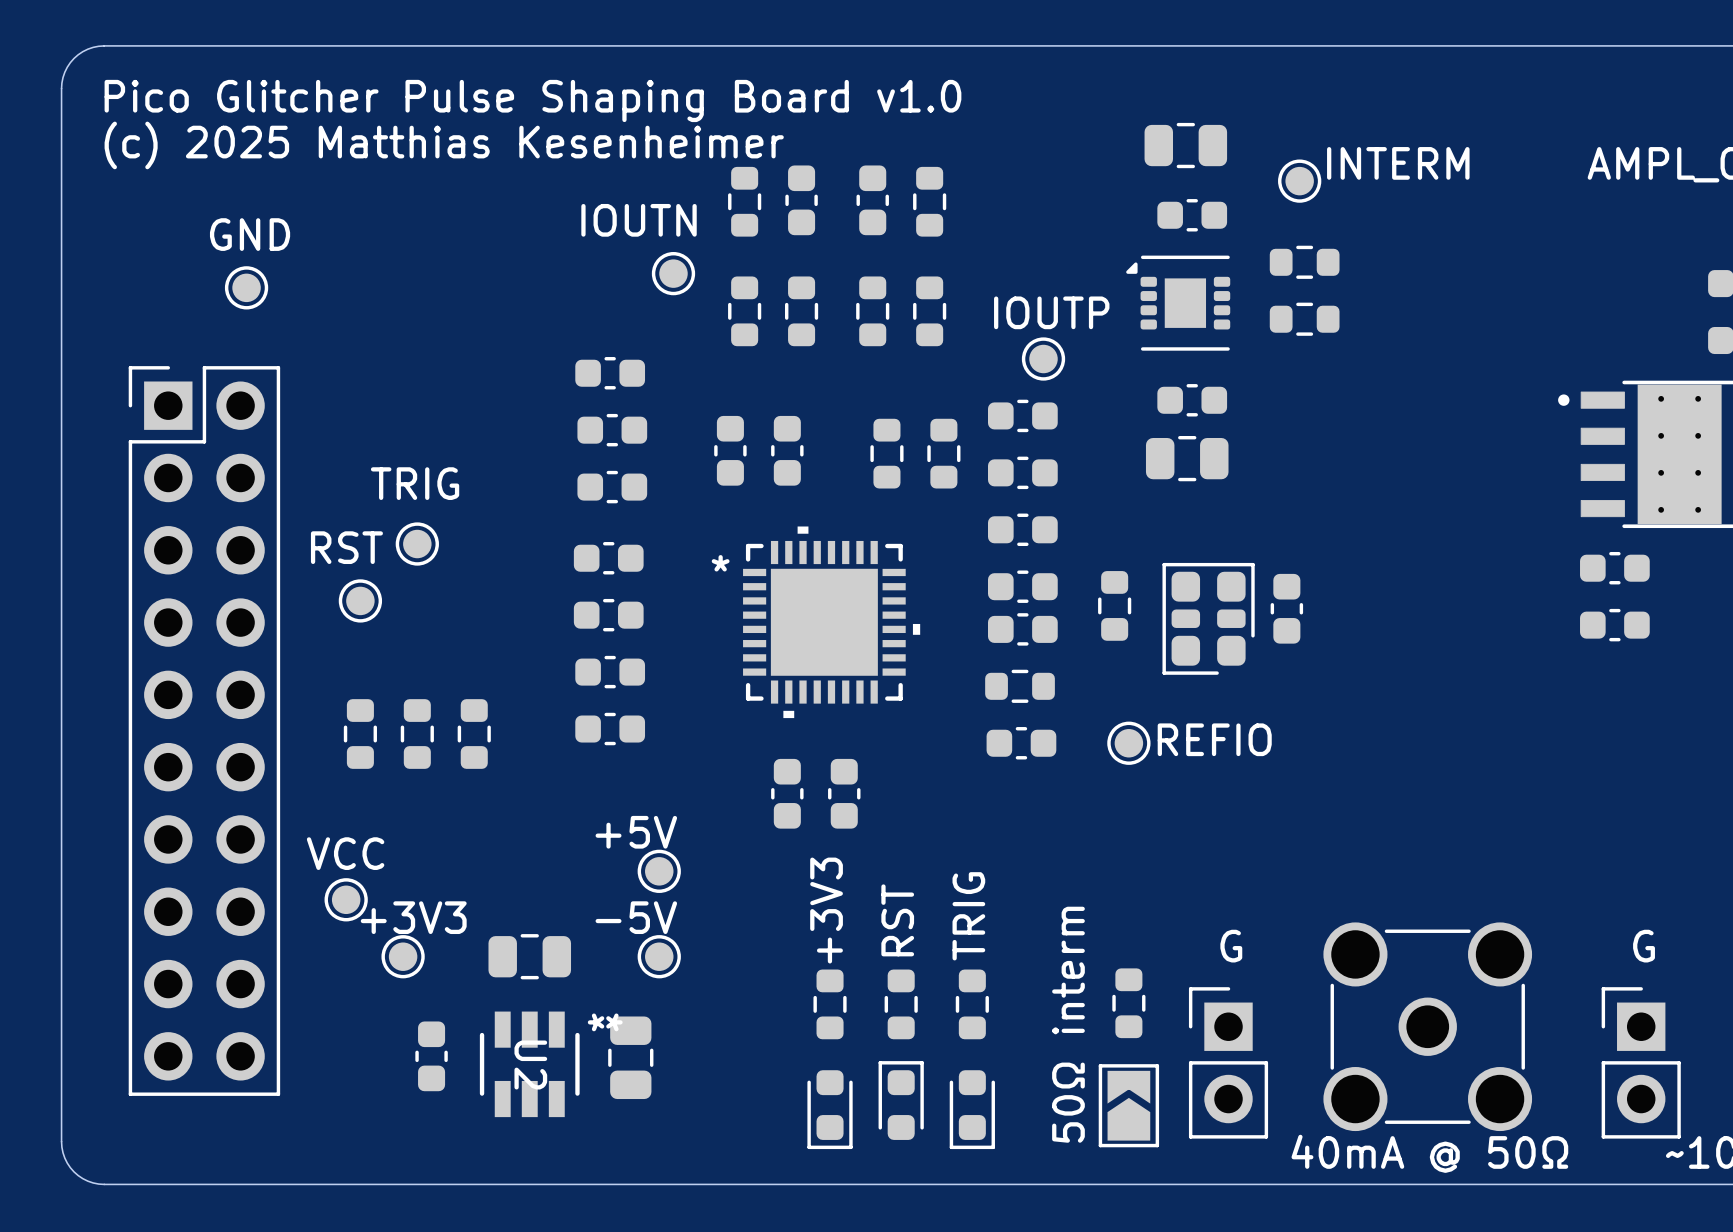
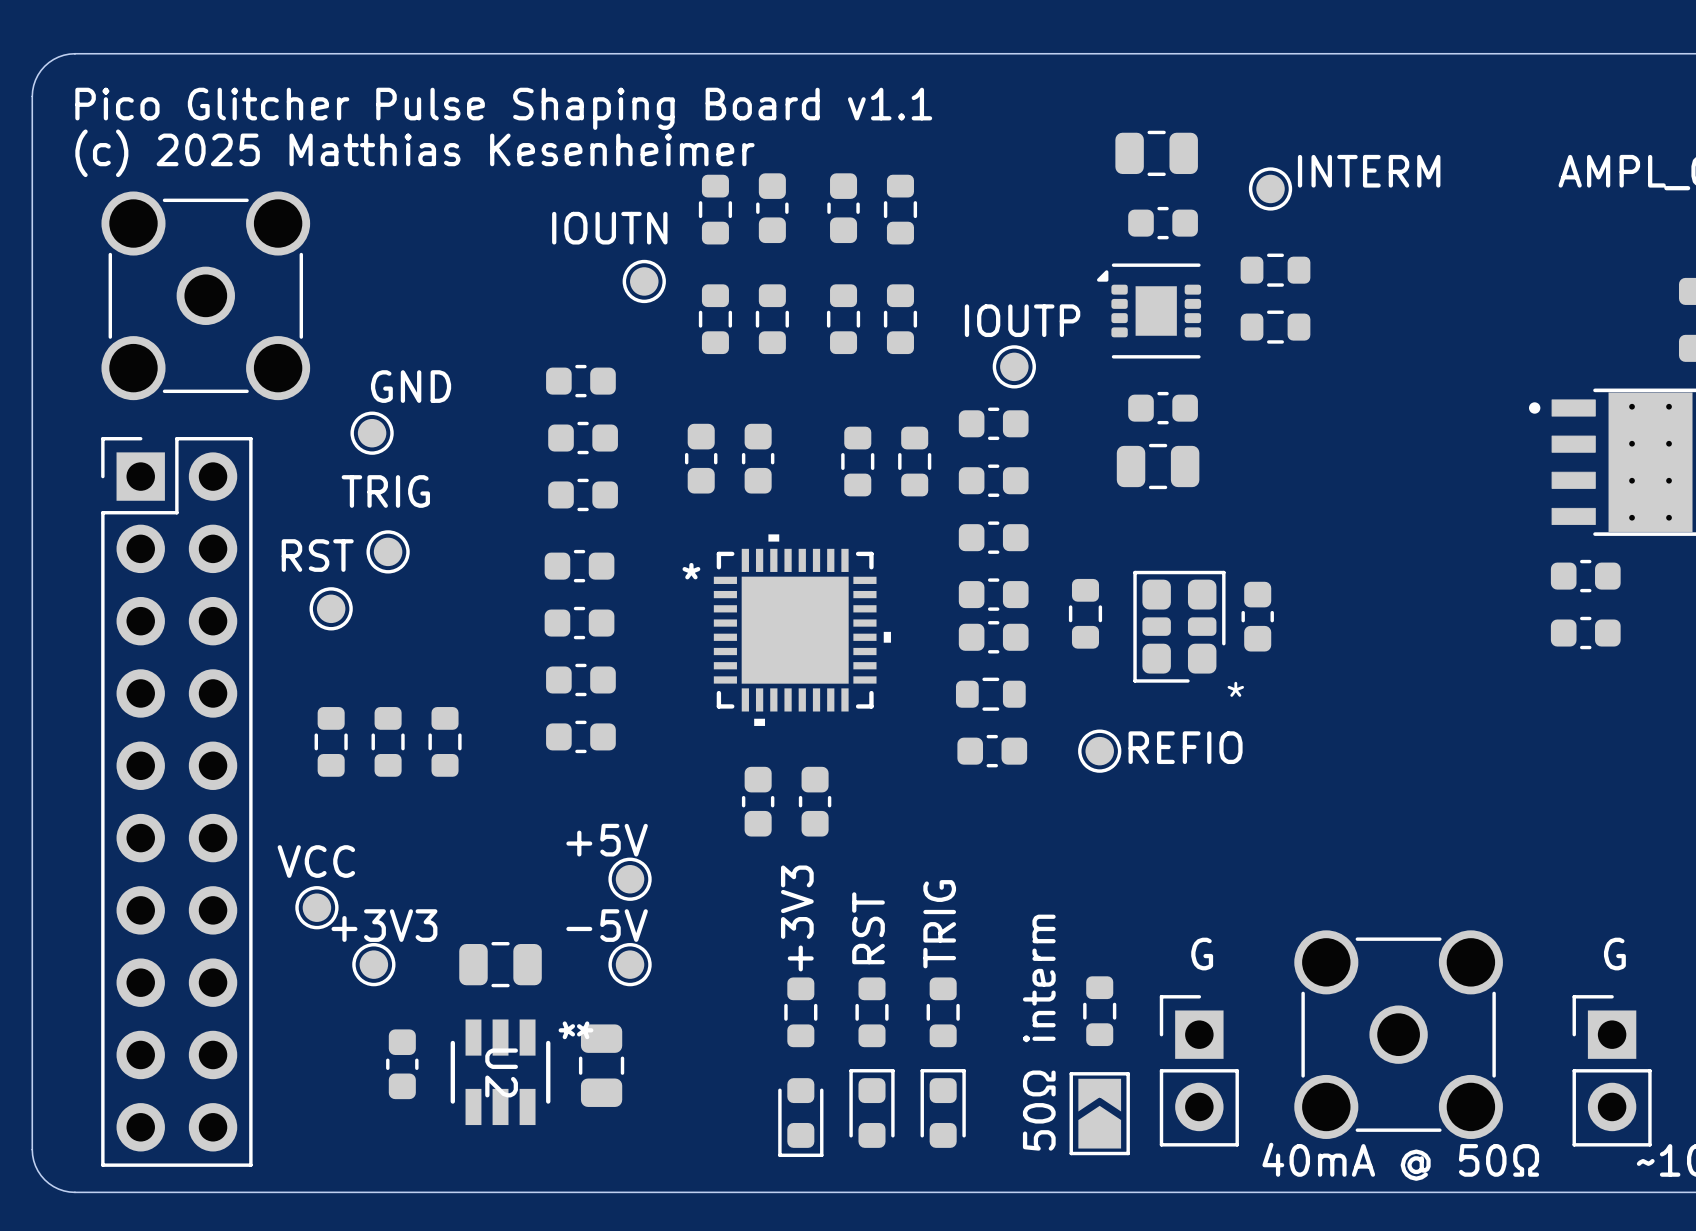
text: Pico Glitcher Pulse Shaping Board v1.0 (532, 100) -> Pico Glitcher Pulse Shaping Board v1.1 (503, 108)
text position: GND (250, 234) -> GND (411, 386)
part footprint: [224, 266, 269, 310] -> [101, 191, 311, 401]
part: none -> (372, 433)
text: none -> * (1235, 689)
part position: (204, 731) -> (176, 801)
part rotation: 0° (972, 1109) -> 180° (943, 1108)

